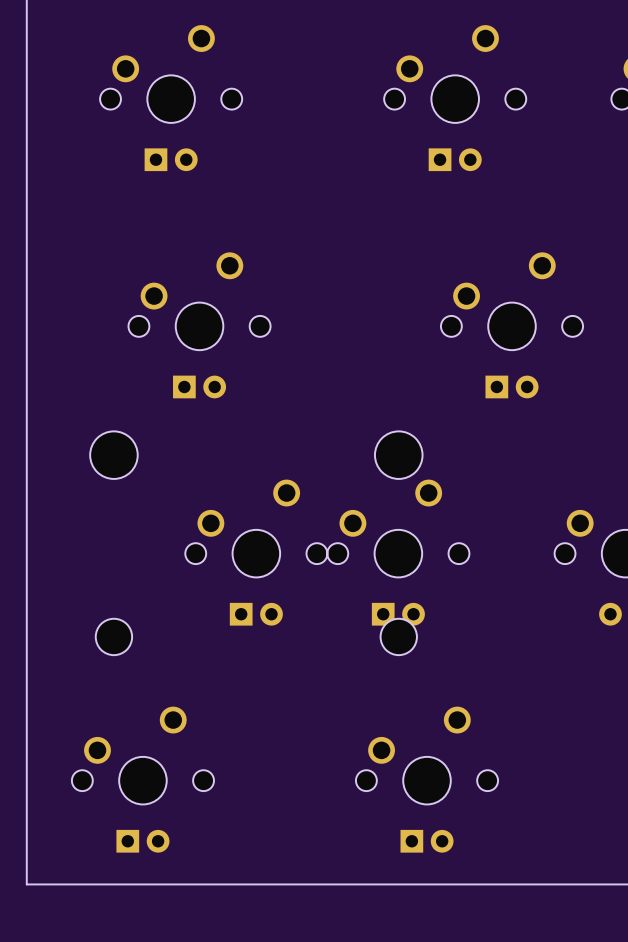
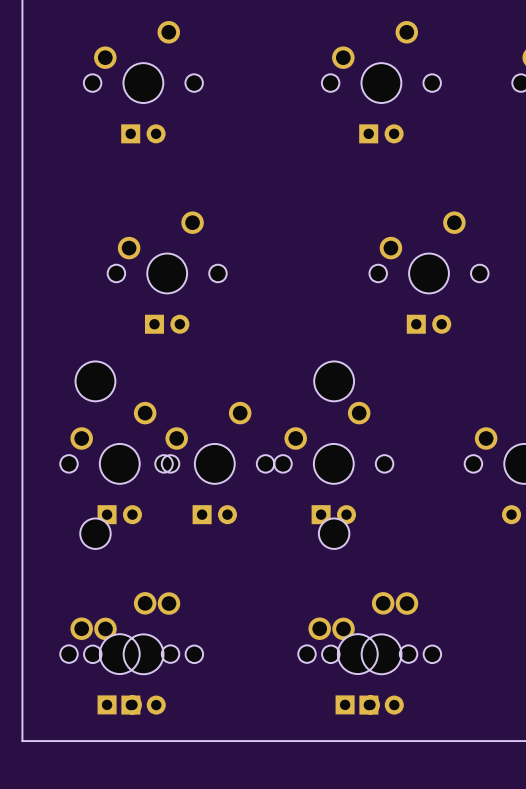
part: none -> (119, 463)
part: none -> (143, 653)
part: none -> (381, 653)

